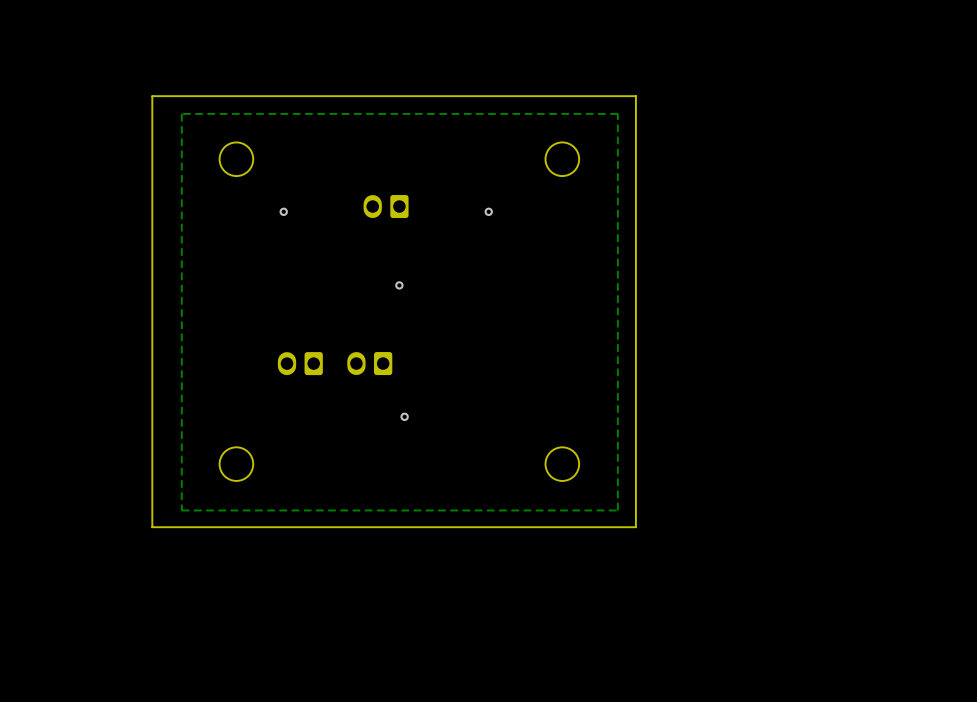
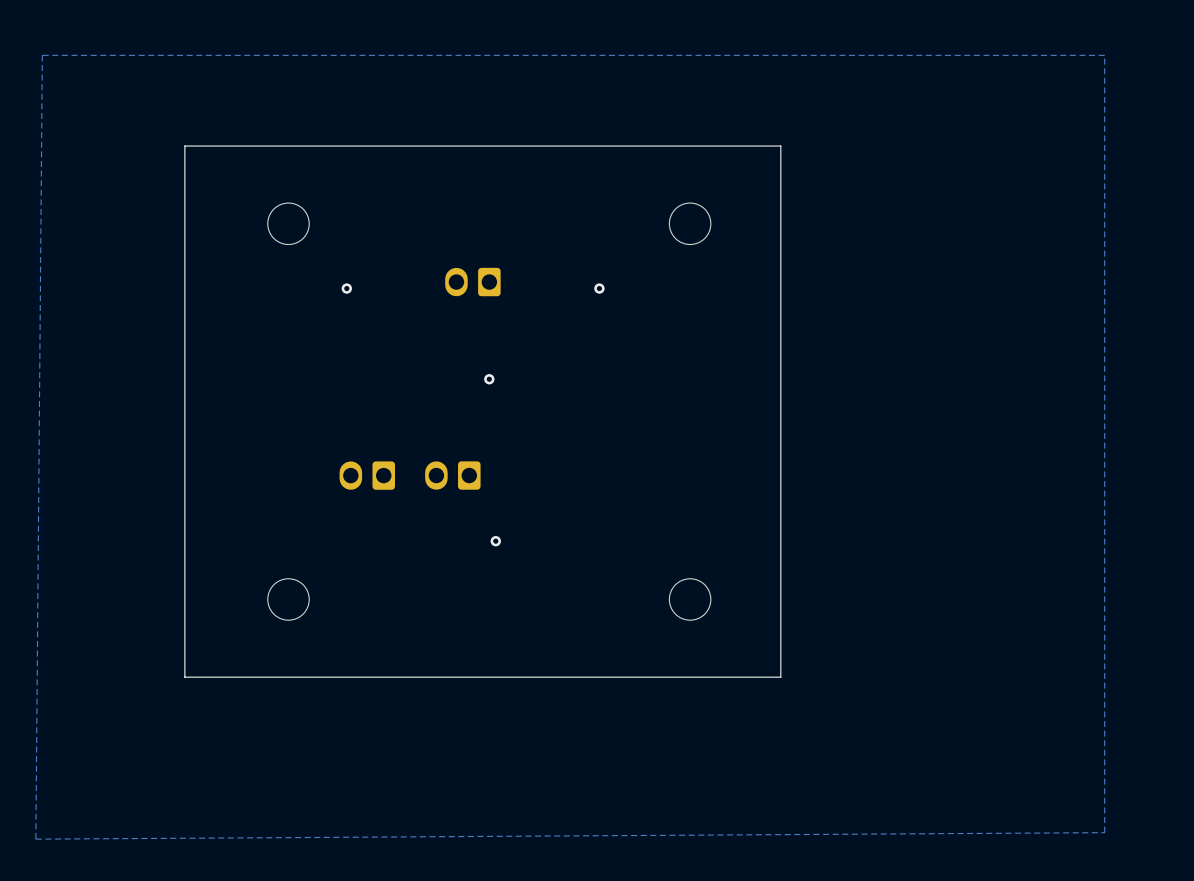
zone outline: none -> (1104, 55) (42, 55) (35, 839) (1104, 832) (1104, 55)
zone outline: (617, 113) (181, 113) (181, 510) (617, 510) (617, 113) -> none

